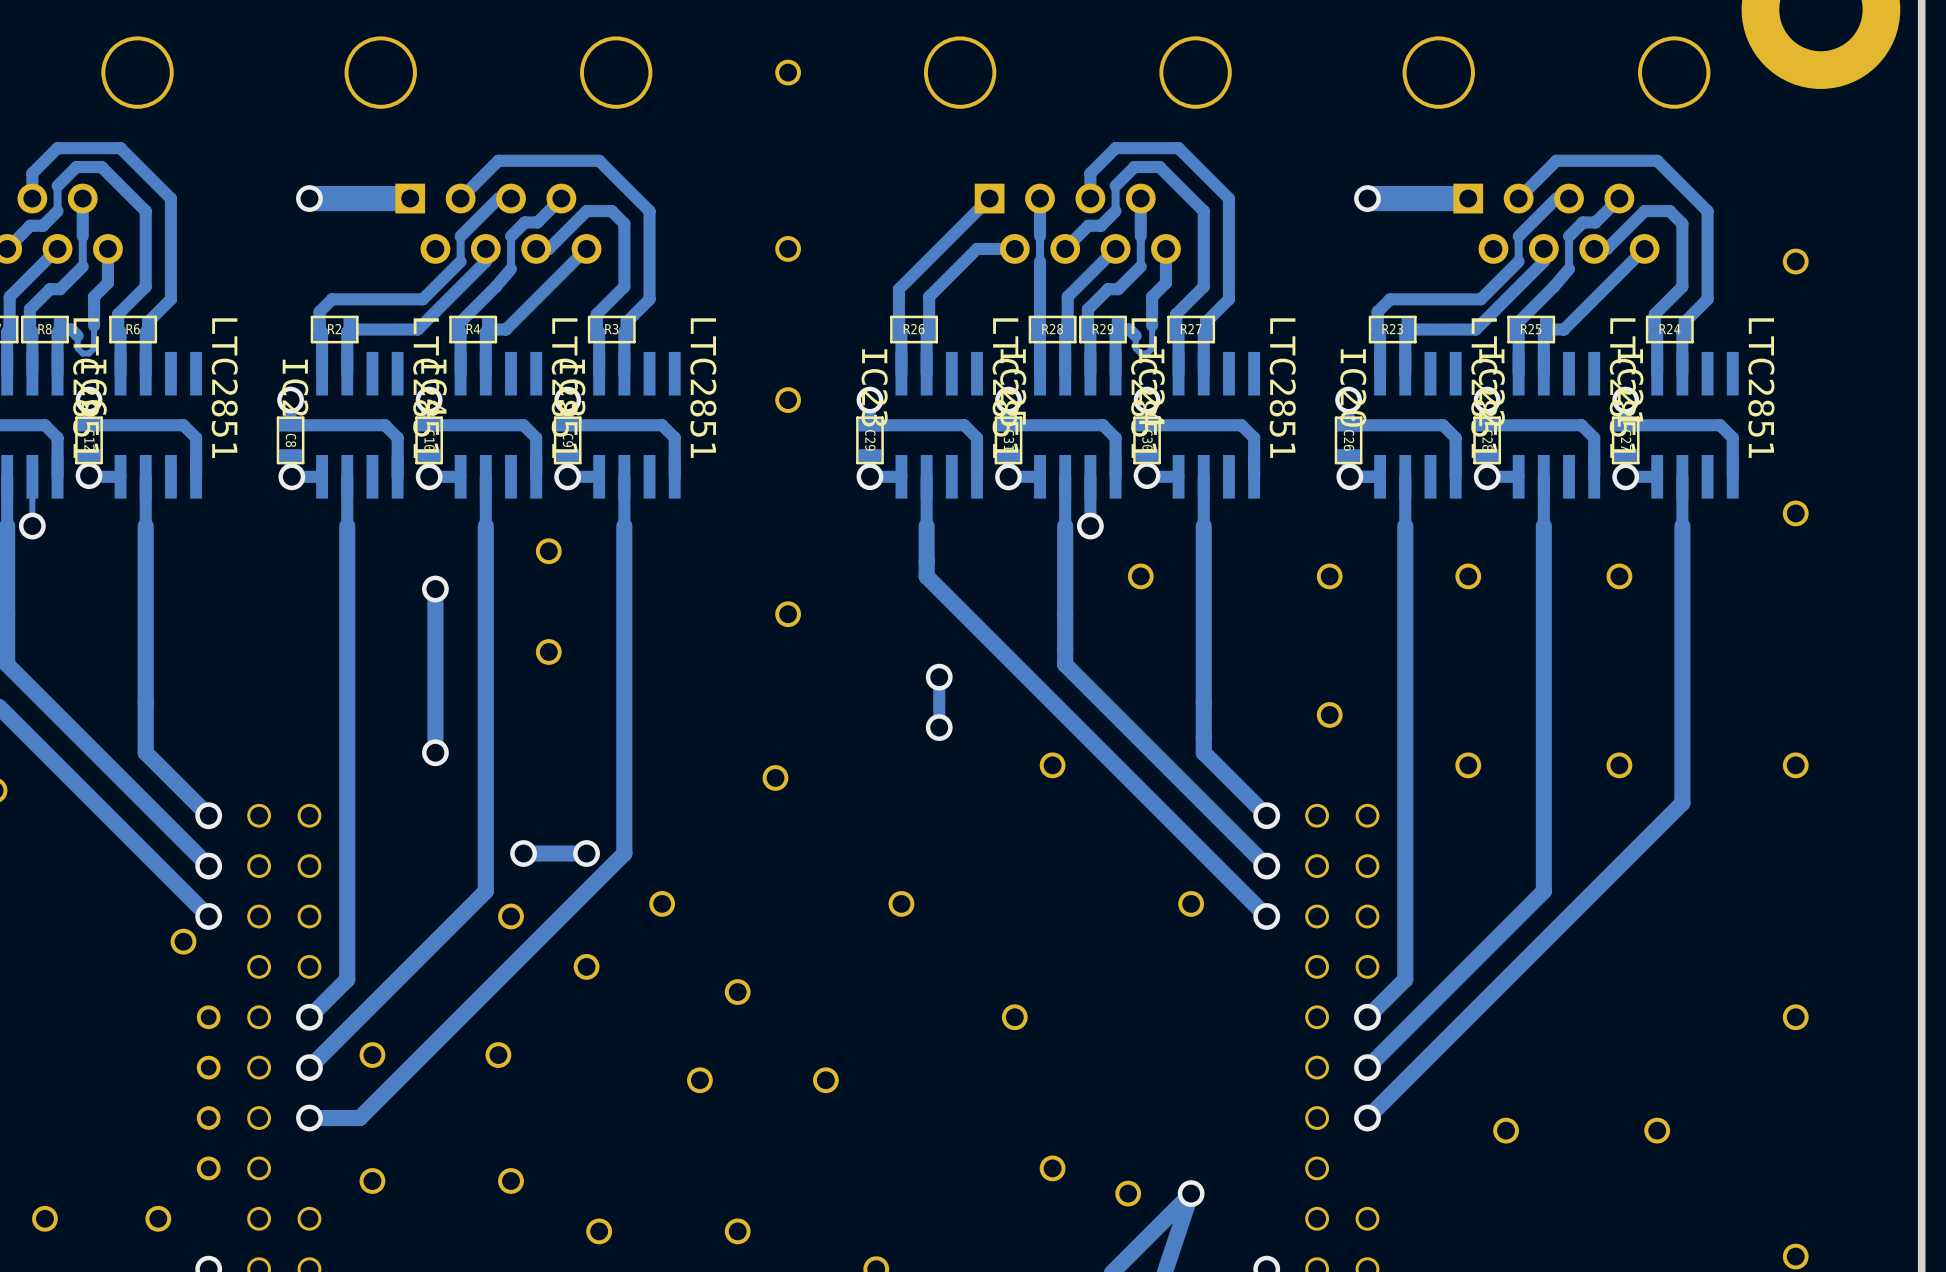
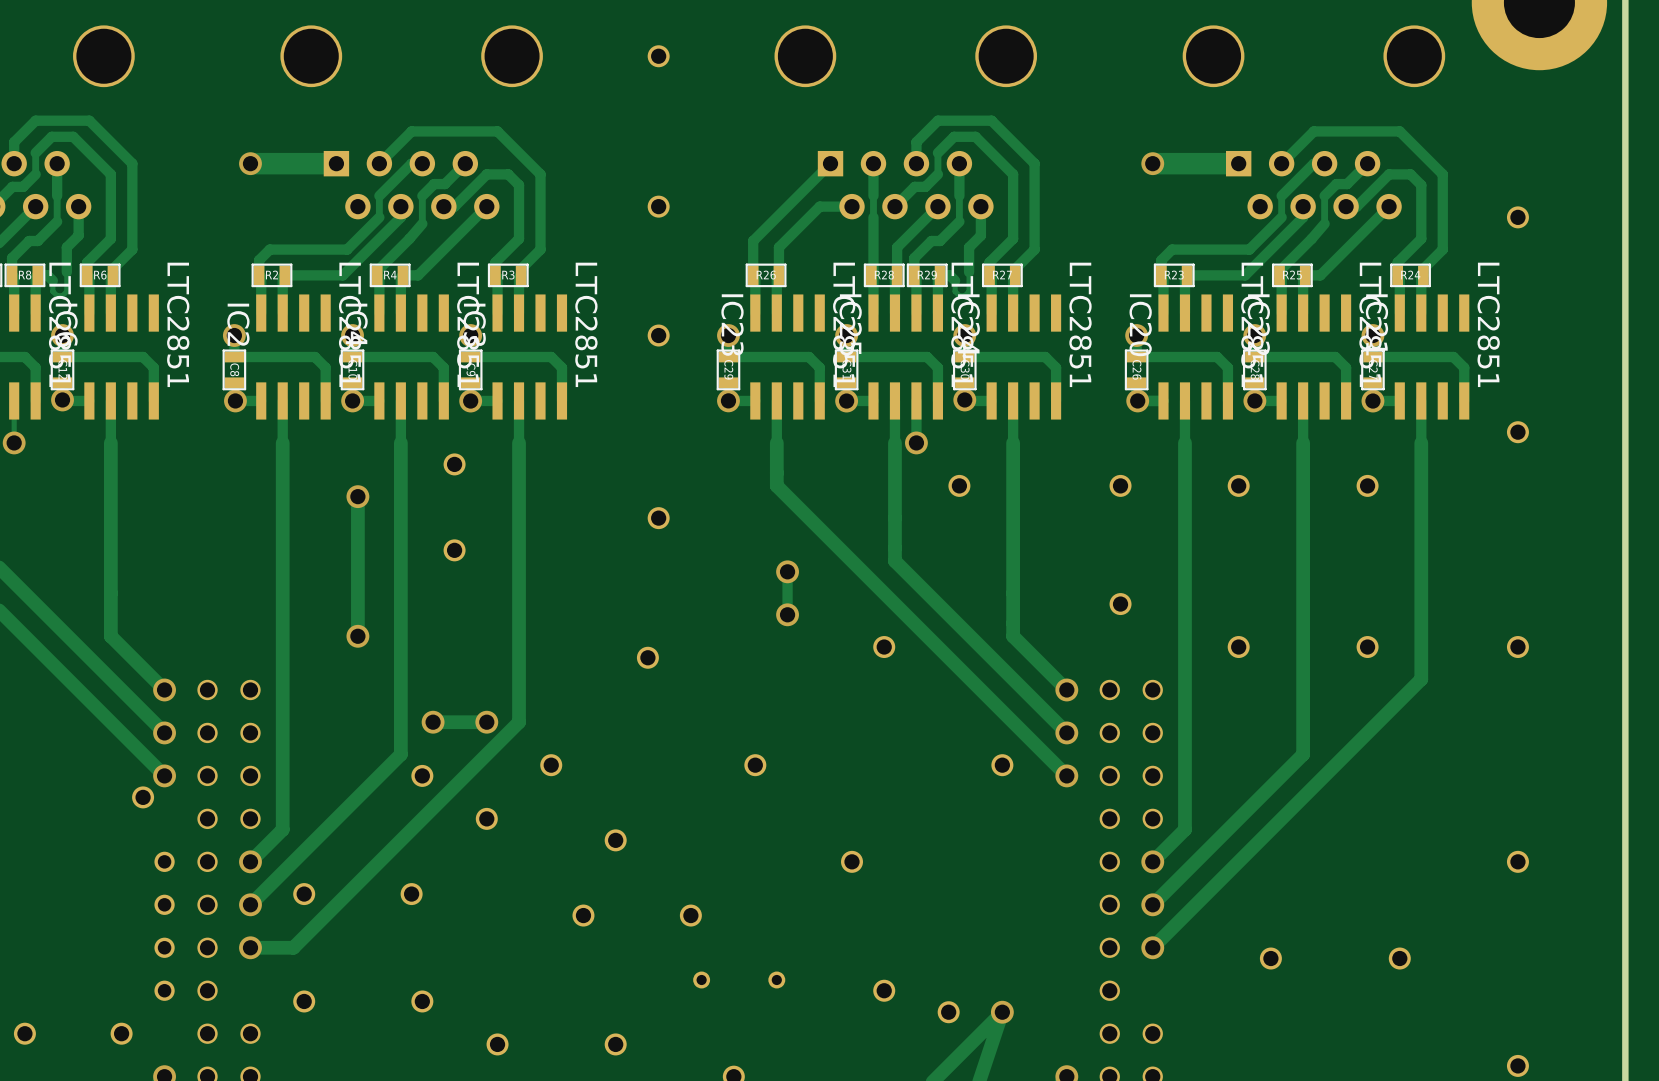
part: none -> (701, 980)
part: none -> (776, 980)

